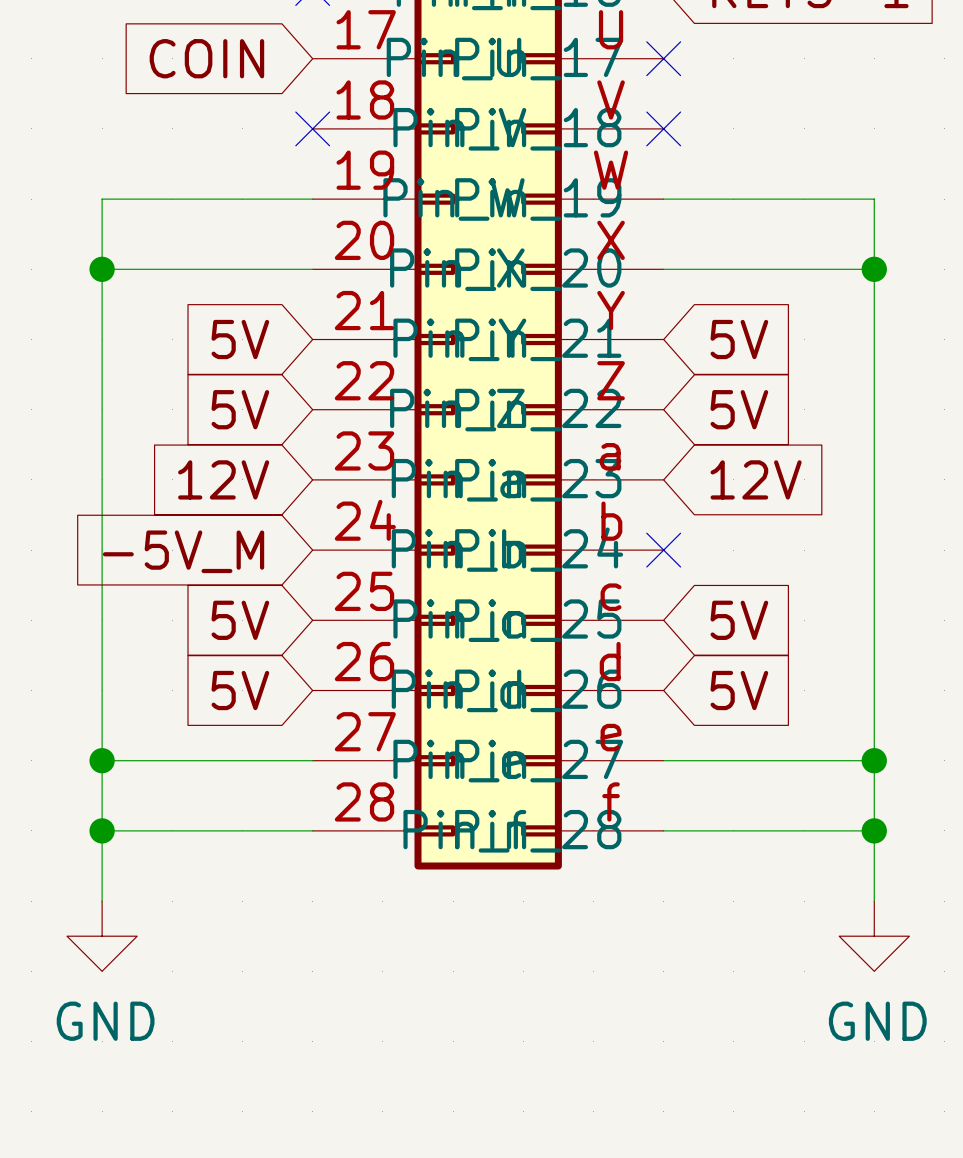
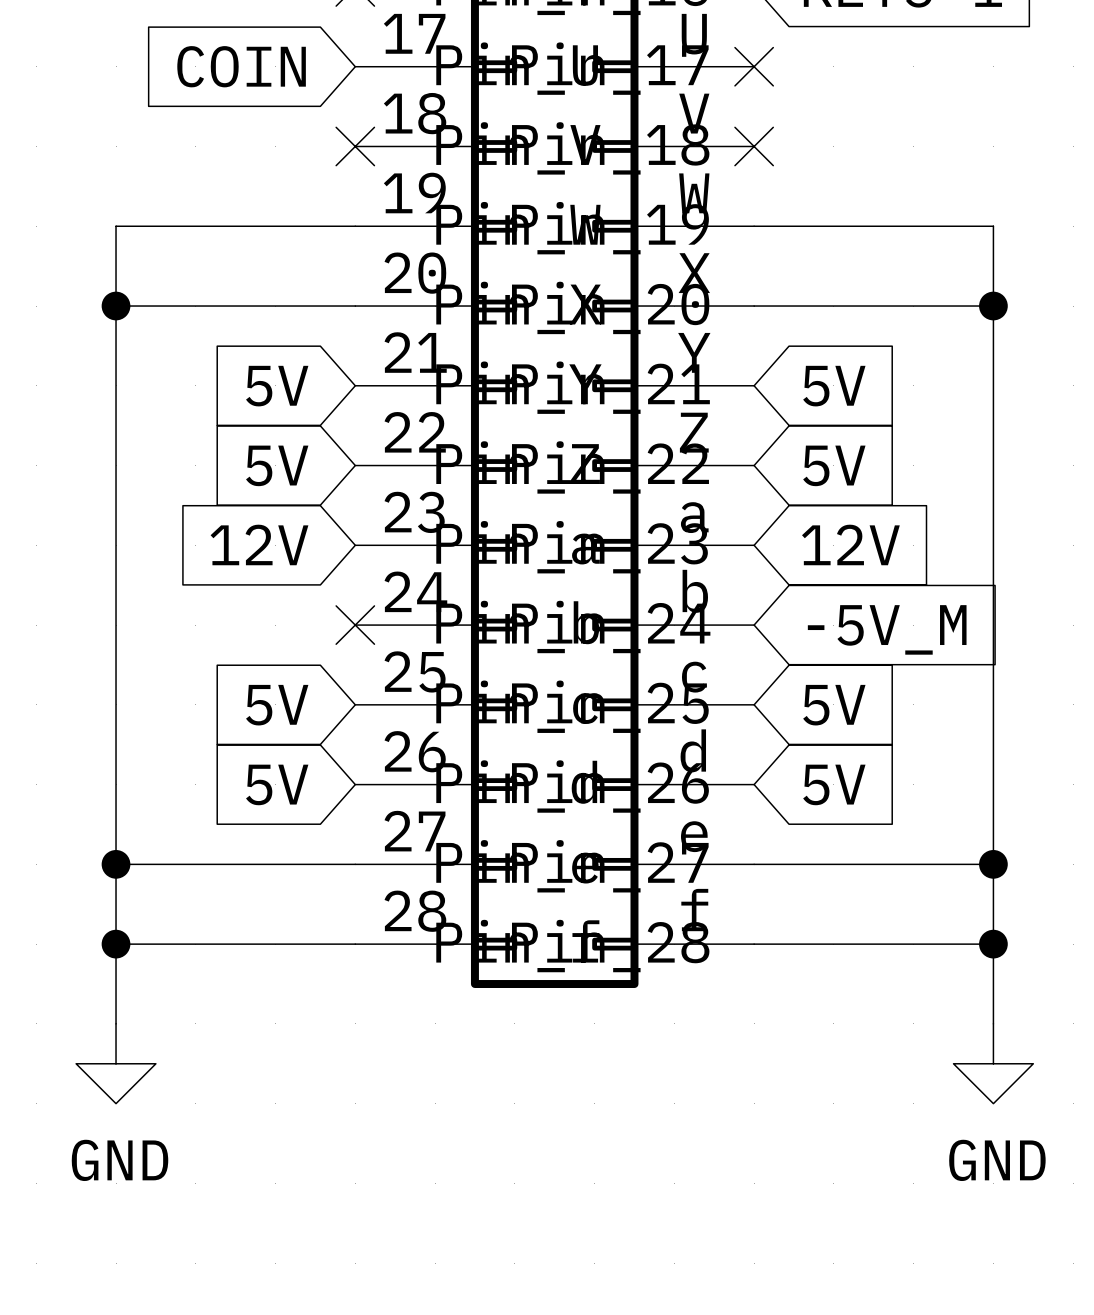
no-connect mark: none -> (355, 625)
no-connect mark: (663, 550) -> none
global label rotation: 0° (183, 551) -> 180° (887, 629)
global label position: -5V_M (183, 551) -> -5V_M (887, 629)

